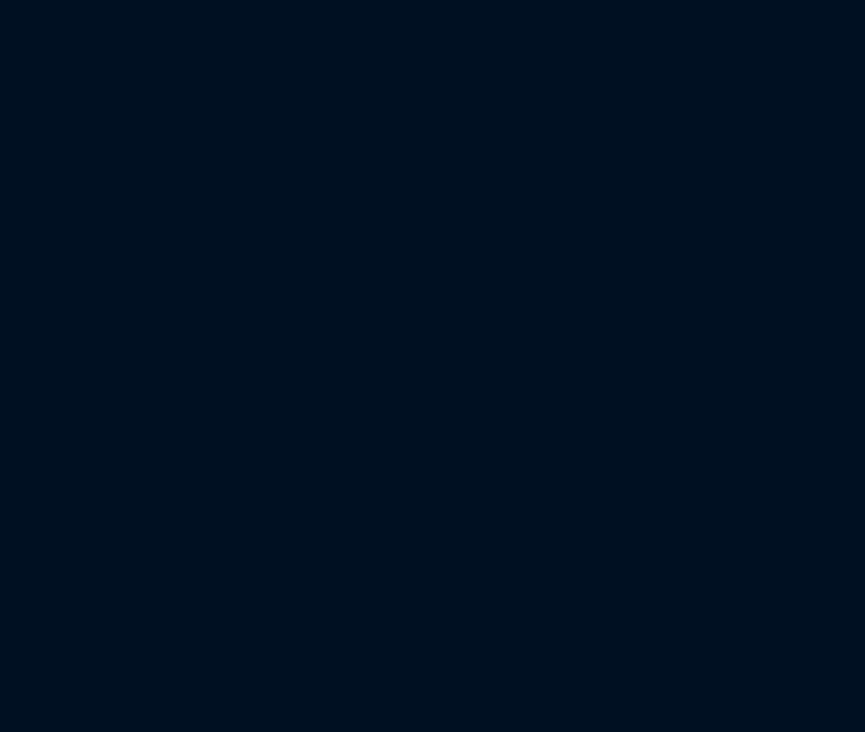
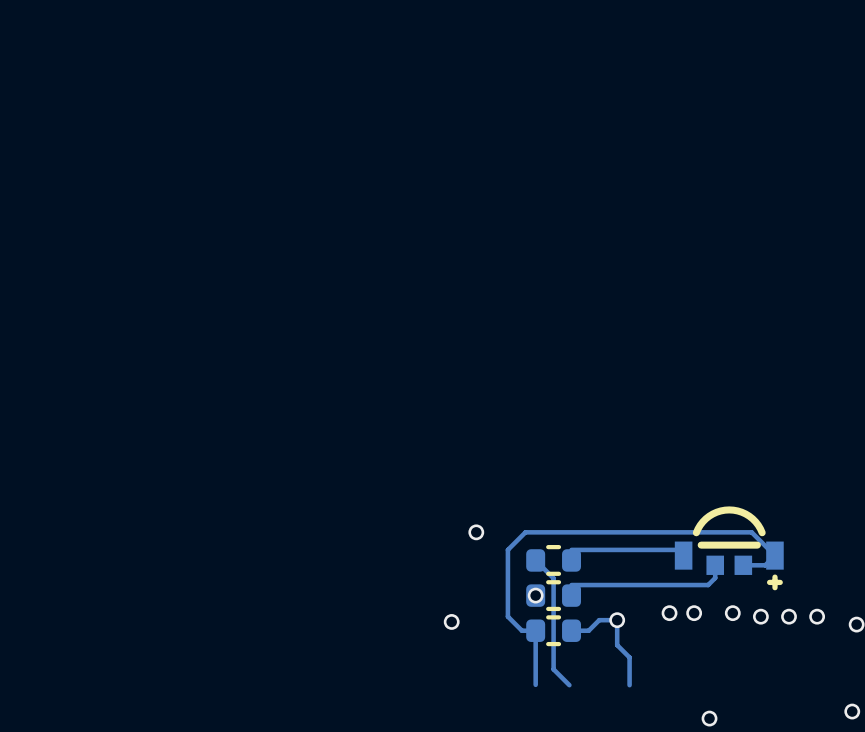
via: none -> (476, 532)
part: none -> (729, 548)
track: none -> (571, 549) (677, 549) (683, 555)
track: none -> (535, 560) (553, 578) (553, 669) (569, 685)
part: none -> (553, 560)
track: none -> (715, 565) (715, 578) (708, 585) (571, 585)
track: none -> (743, 565) (765, 565) (774, 555) (751, 532) (525, 532) (507, 549) (507, 616) (521, 630) (535, 630) (535, 684)
via: none -> (535, 595)
part: none -> (553, 595)
via: none -> (669, 613)
via: none -> (694, 613)
via: none -> (732, 613)
via: none -> (760, 616)
via: none -> (789, 616)
via: none -> (817, 616)
via: none -> (617, 620)
via: none -> (451, 621)
via: none -> (856, 624)
part: none -> (553, 630)
track: none -> (571, 630) (588, 630) (599, 620) (617, 620) (617, 645) (629, 657) (629, 685)
via: none -> (852, 711)
via: none -> (709, 718)

